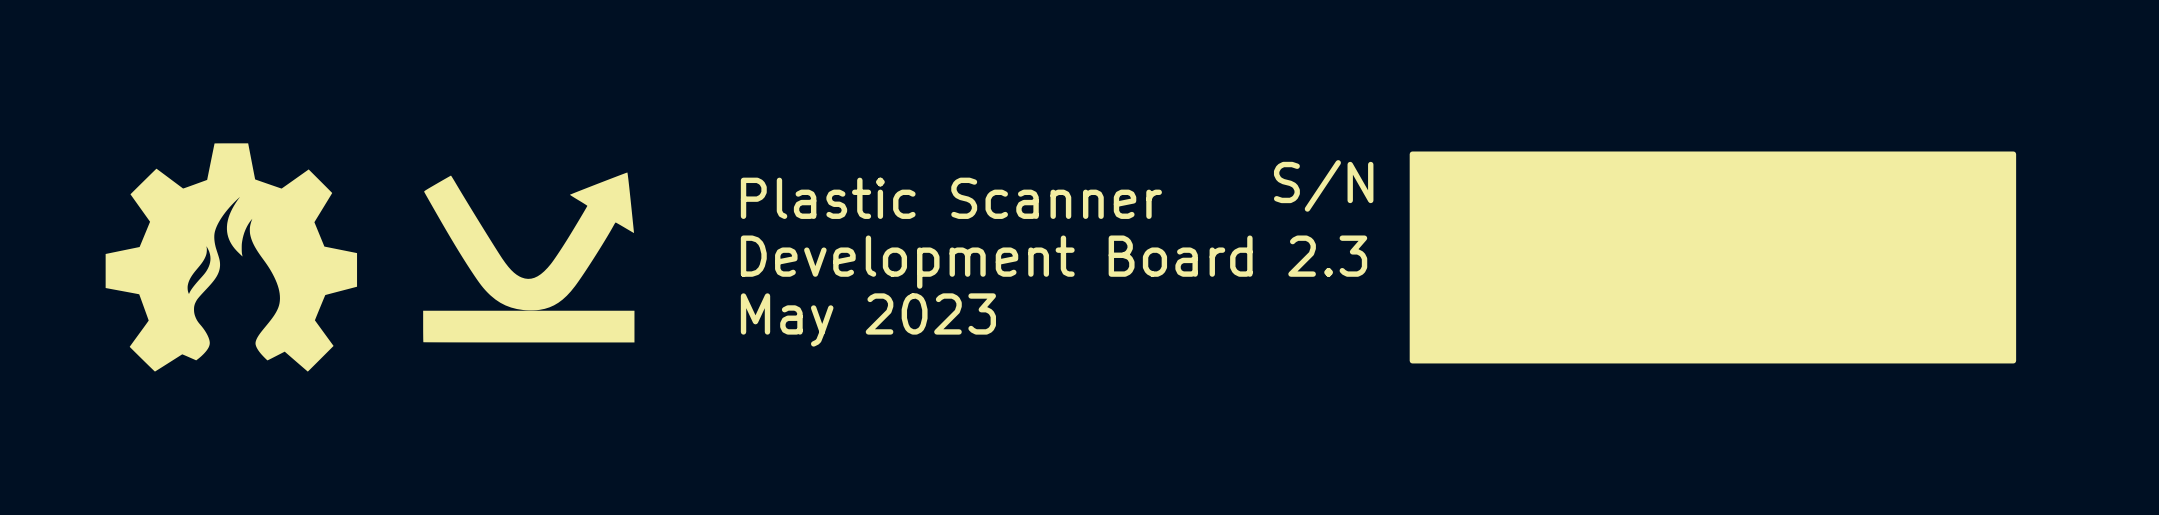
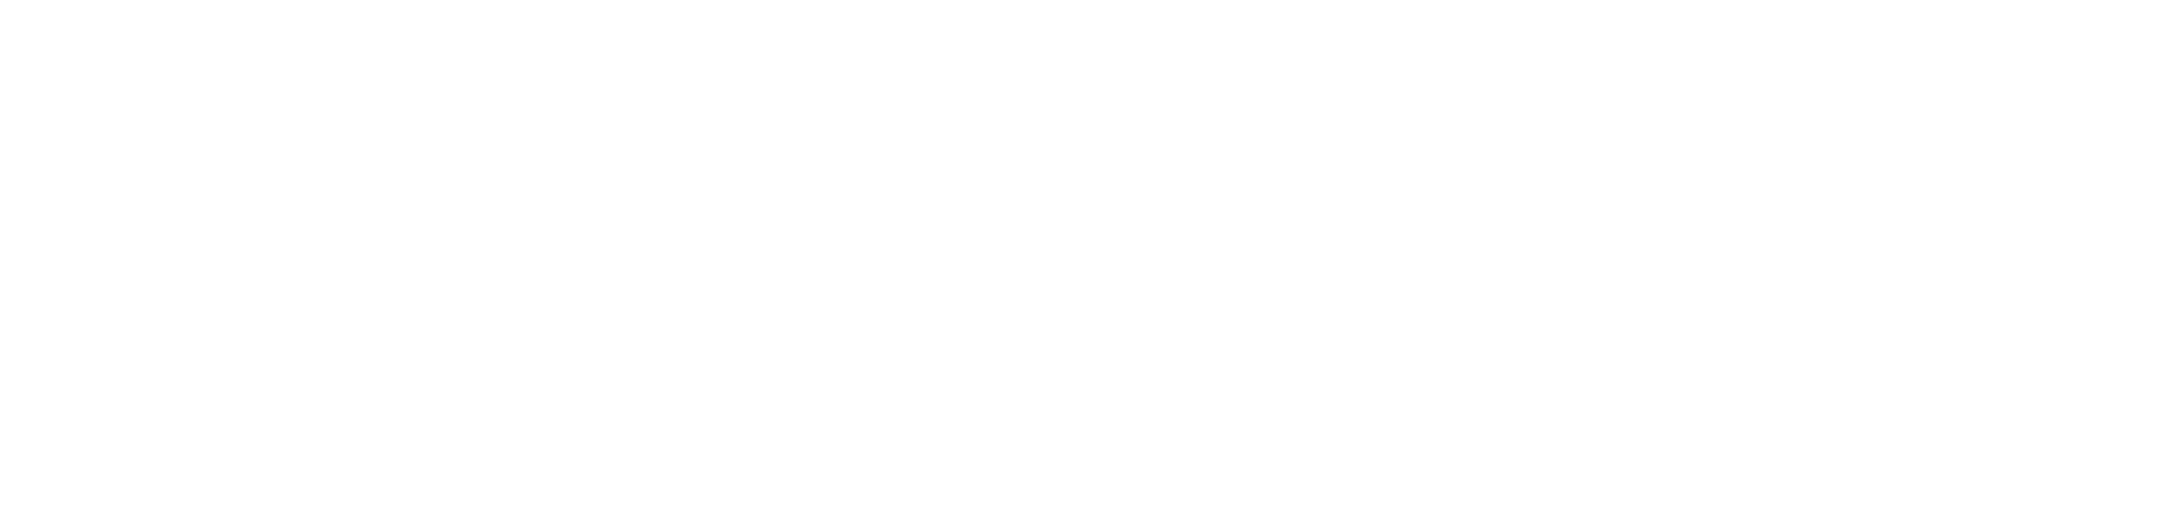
drawing: [105, 143, 358, 372] -> none
drawing: [1409, 151, 2017, 364] -> none
drawing: [423, 172, 635, 343] -> none
text: S/N (1323, 185) -> none
text: Plastic Scanner (951, 198) -> none
text: Development Board 2.3 (1054, 262) -> none
text: May 2023 (868, 319) -> none

